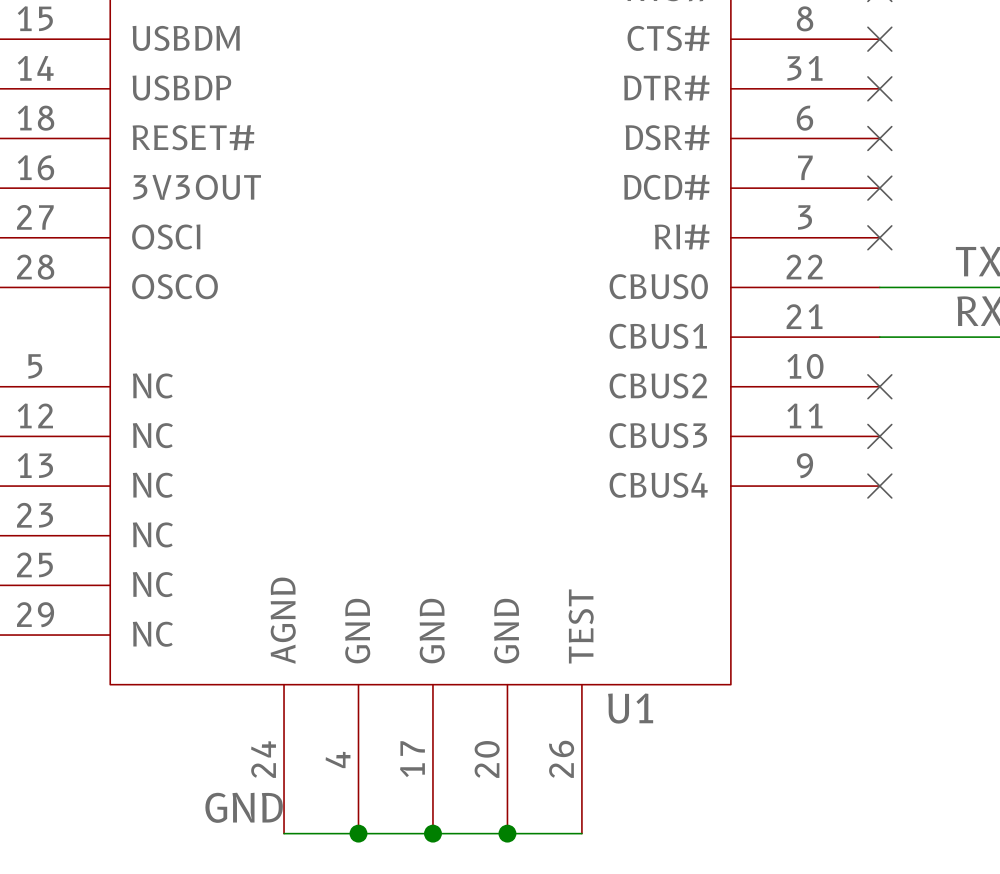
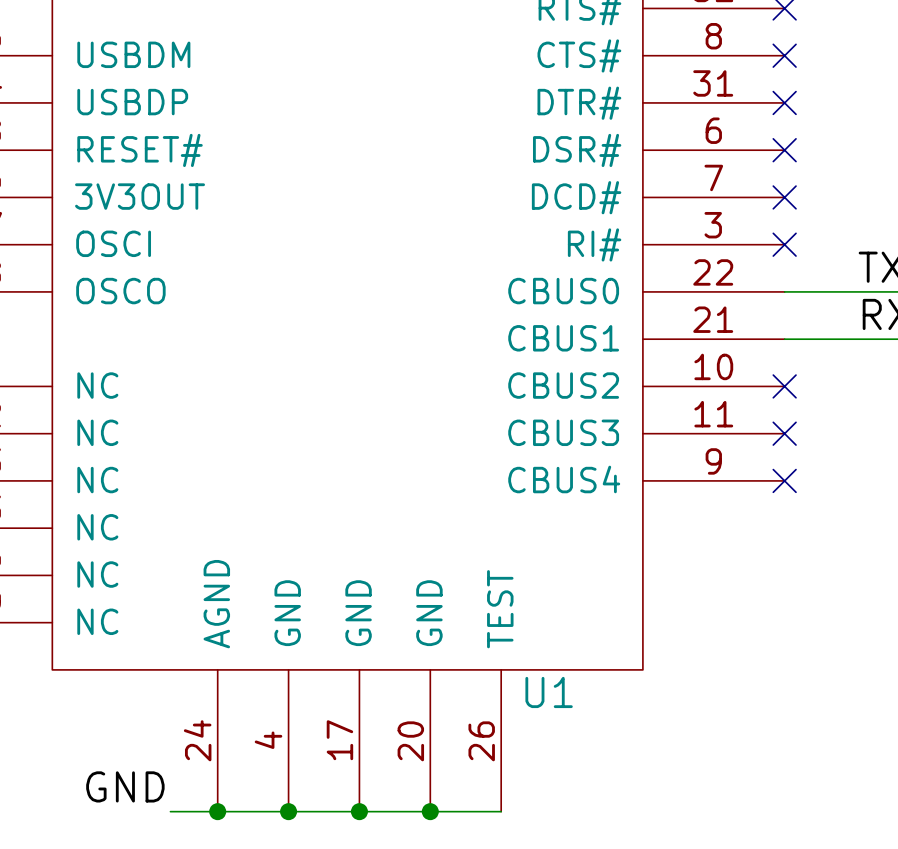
label position: GND (244, 807) -> GND (125, 786)
wire: none -> (170, 811) (217, 811)
junction: none -> (217, 811)

